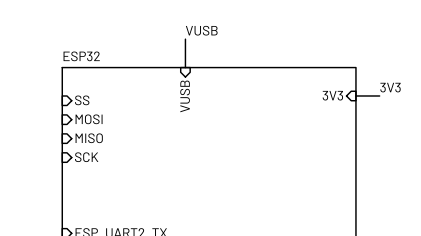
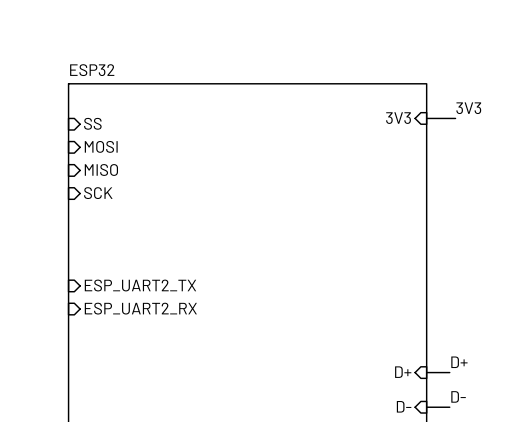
label: VUSB (201, 30) -> none
wire: (185, 39) (185, 67) -> none
sheet pin: VUSB (185, 96) -> none

